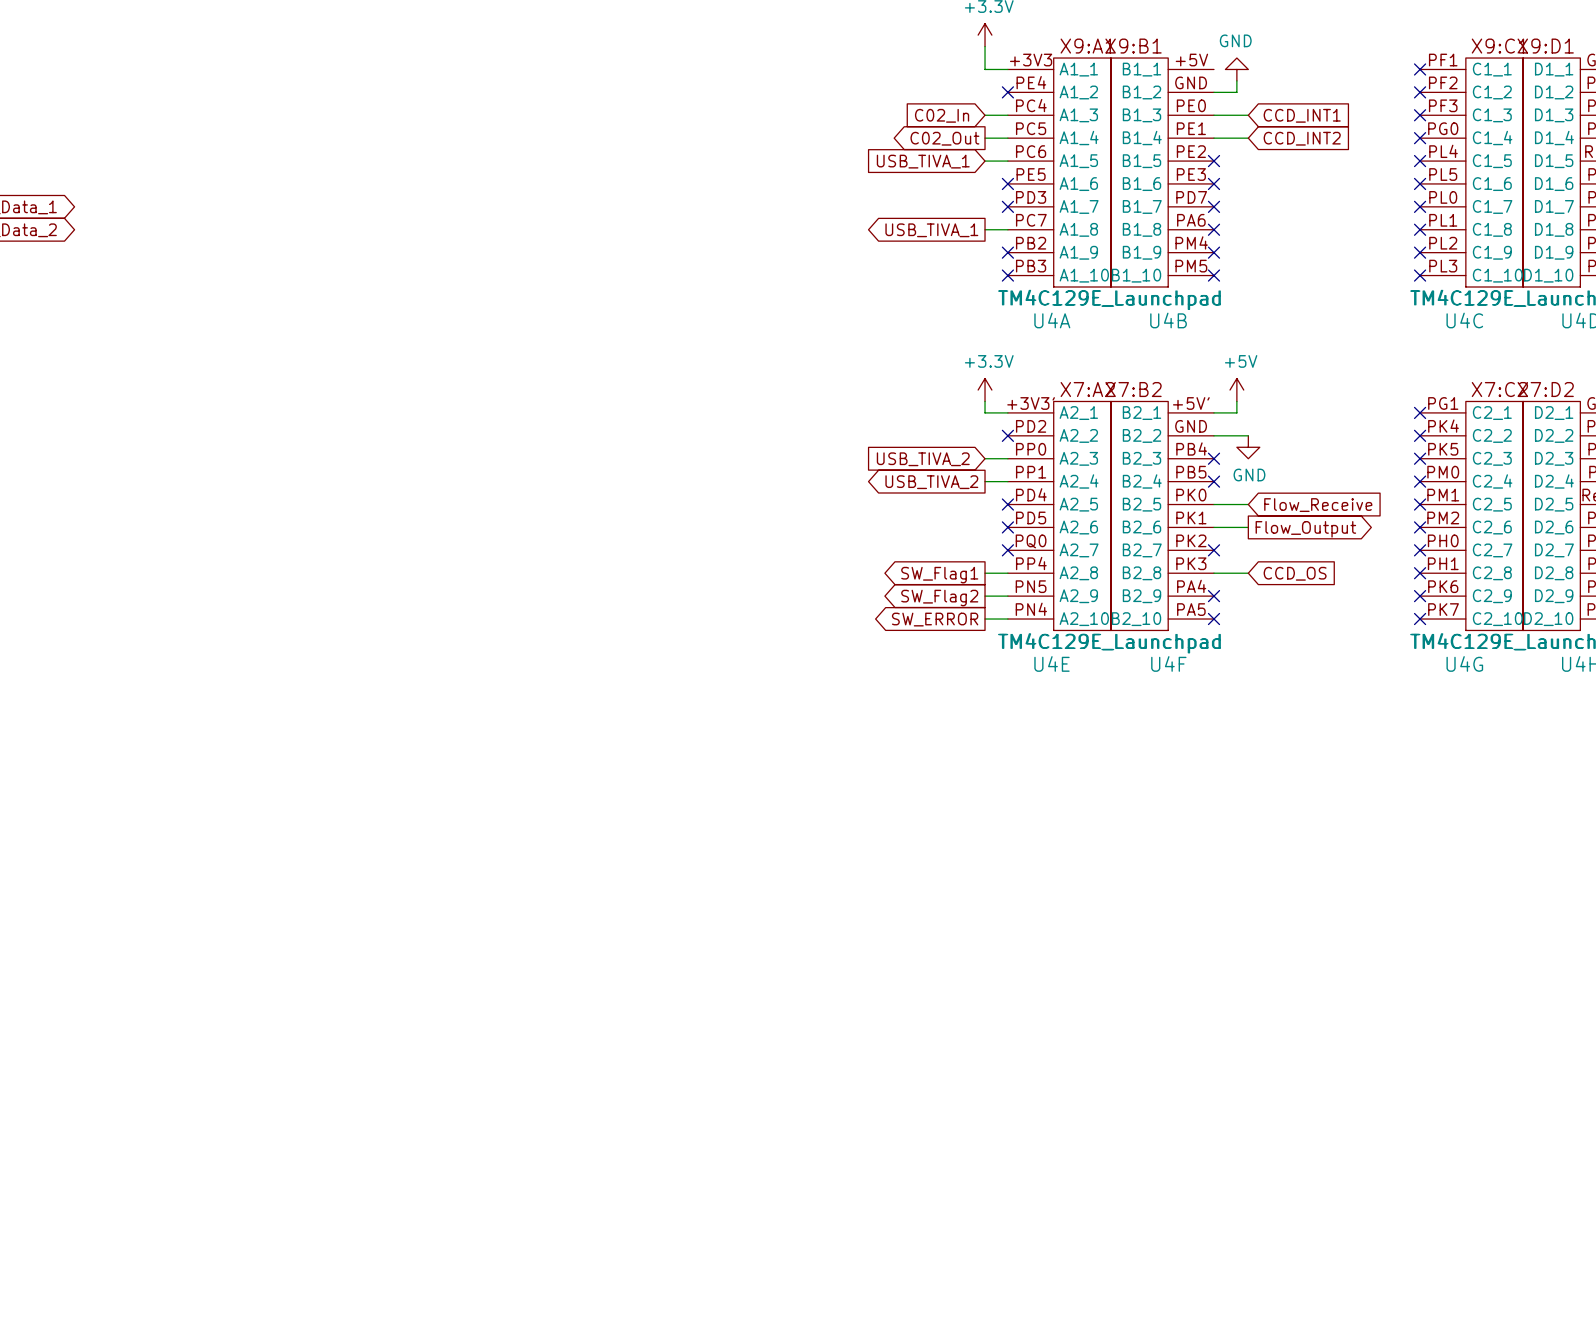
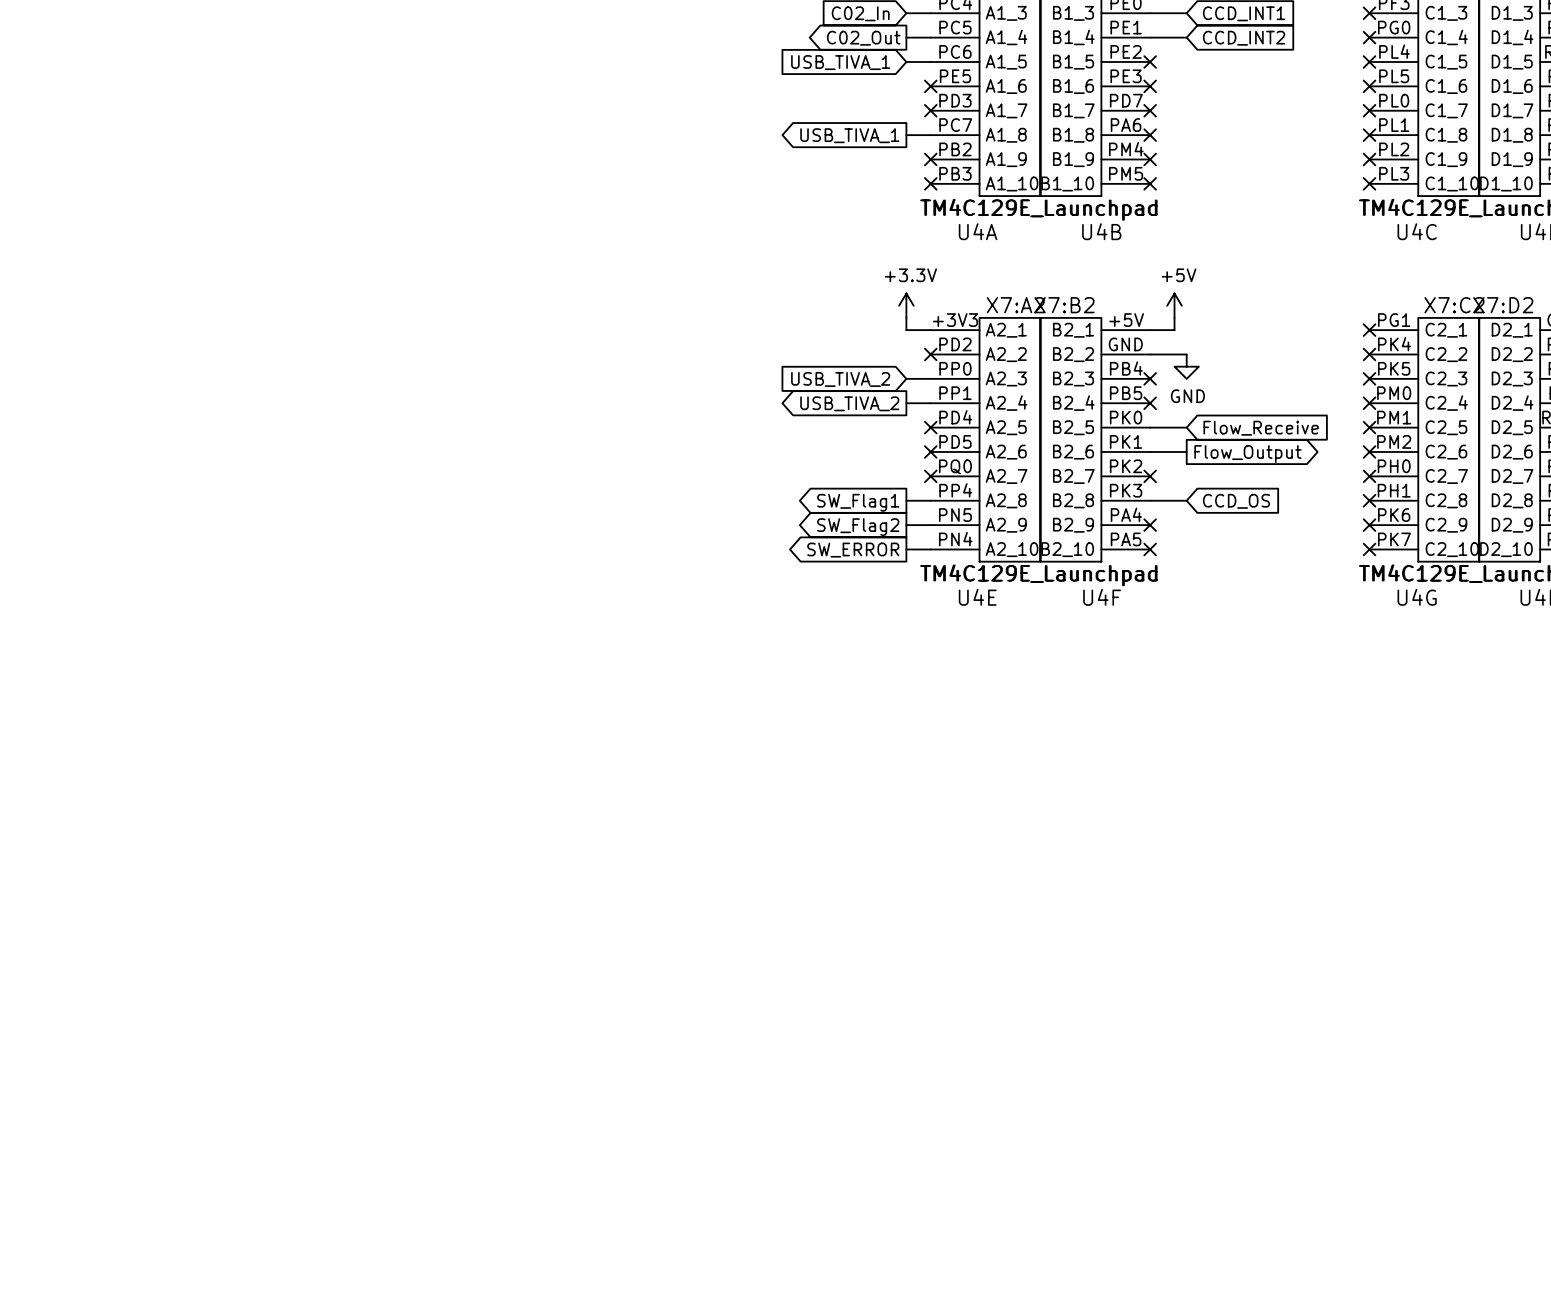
U4E pin number: +3V3' (1031, 403) -> +3V3 (955, 320)
U4F pin number: +5V' (1191, 403) -> +5V (1126, 320)

